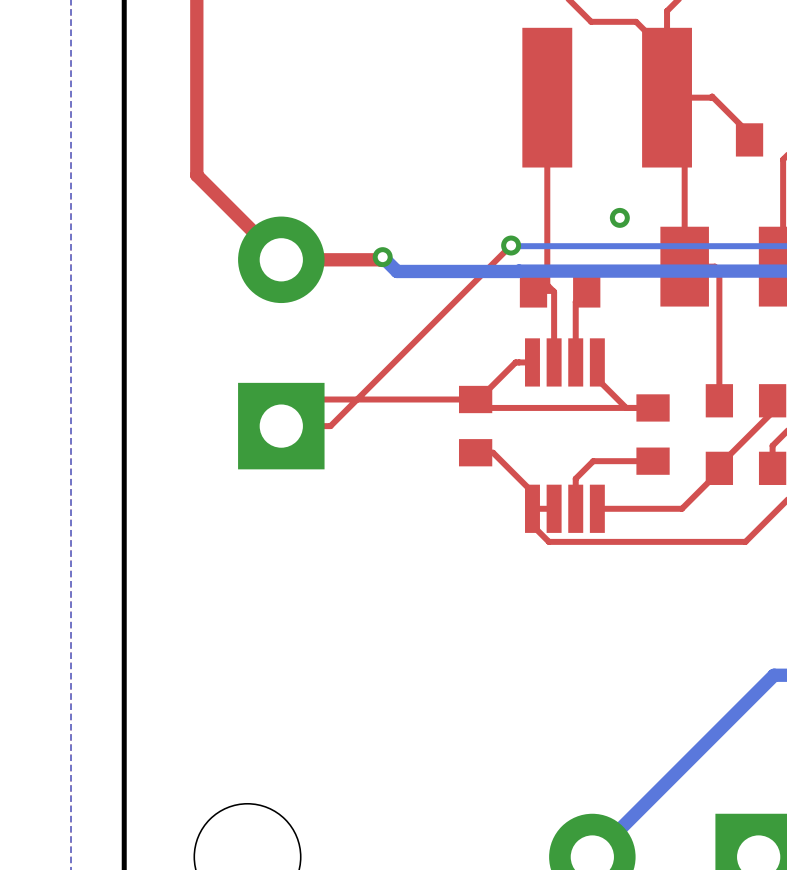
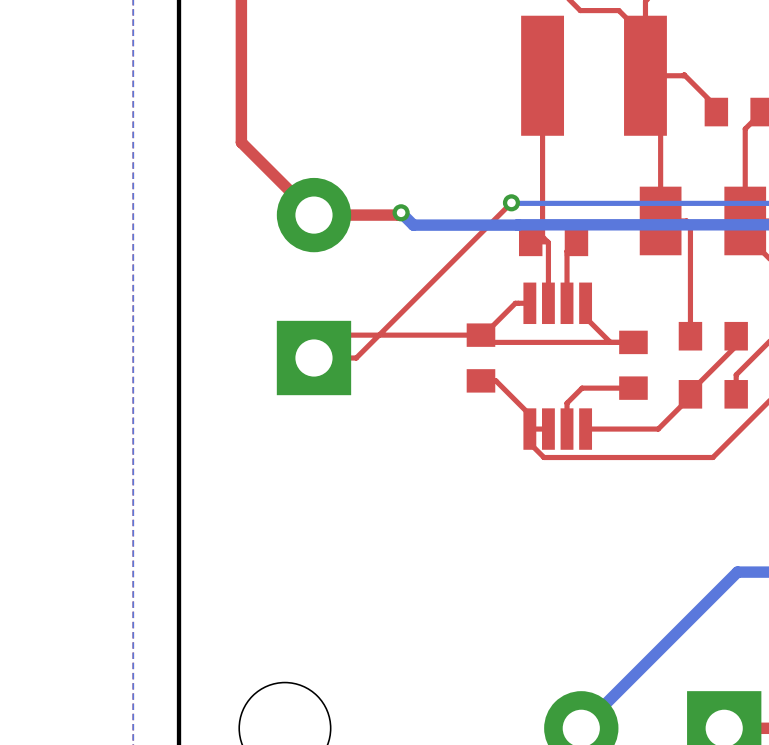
via: (619, 217) -> none

